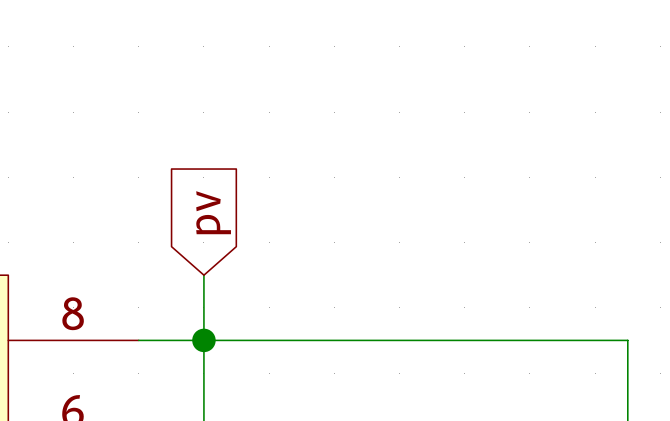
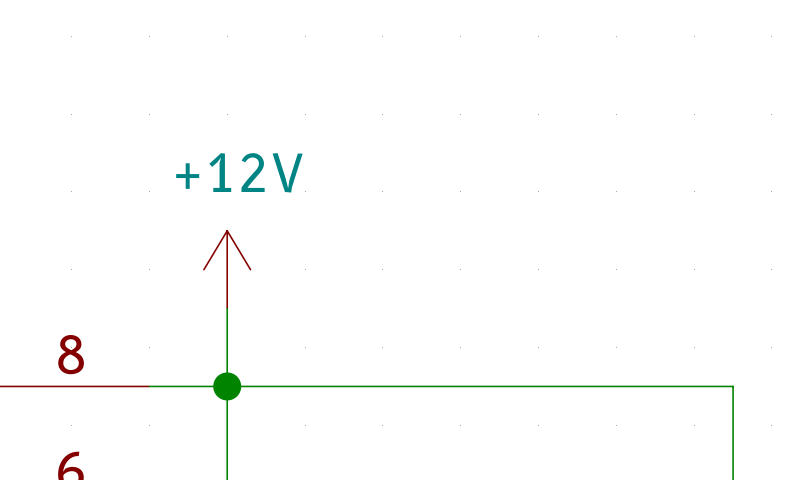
global label: pv (213, 212) -> none
power symbol: none -> +12V (227, 269)

